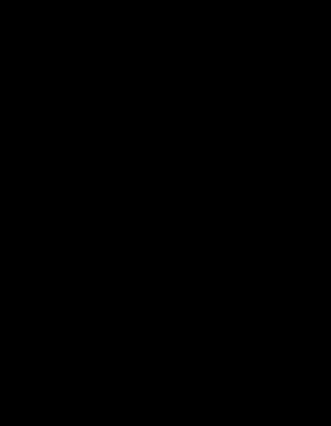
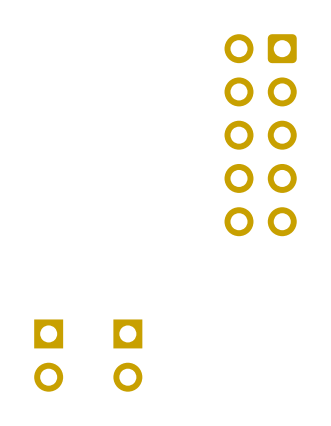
part: none -> (260, 135)
part: none -> (48, 355)
part: none -> (127, 355)

